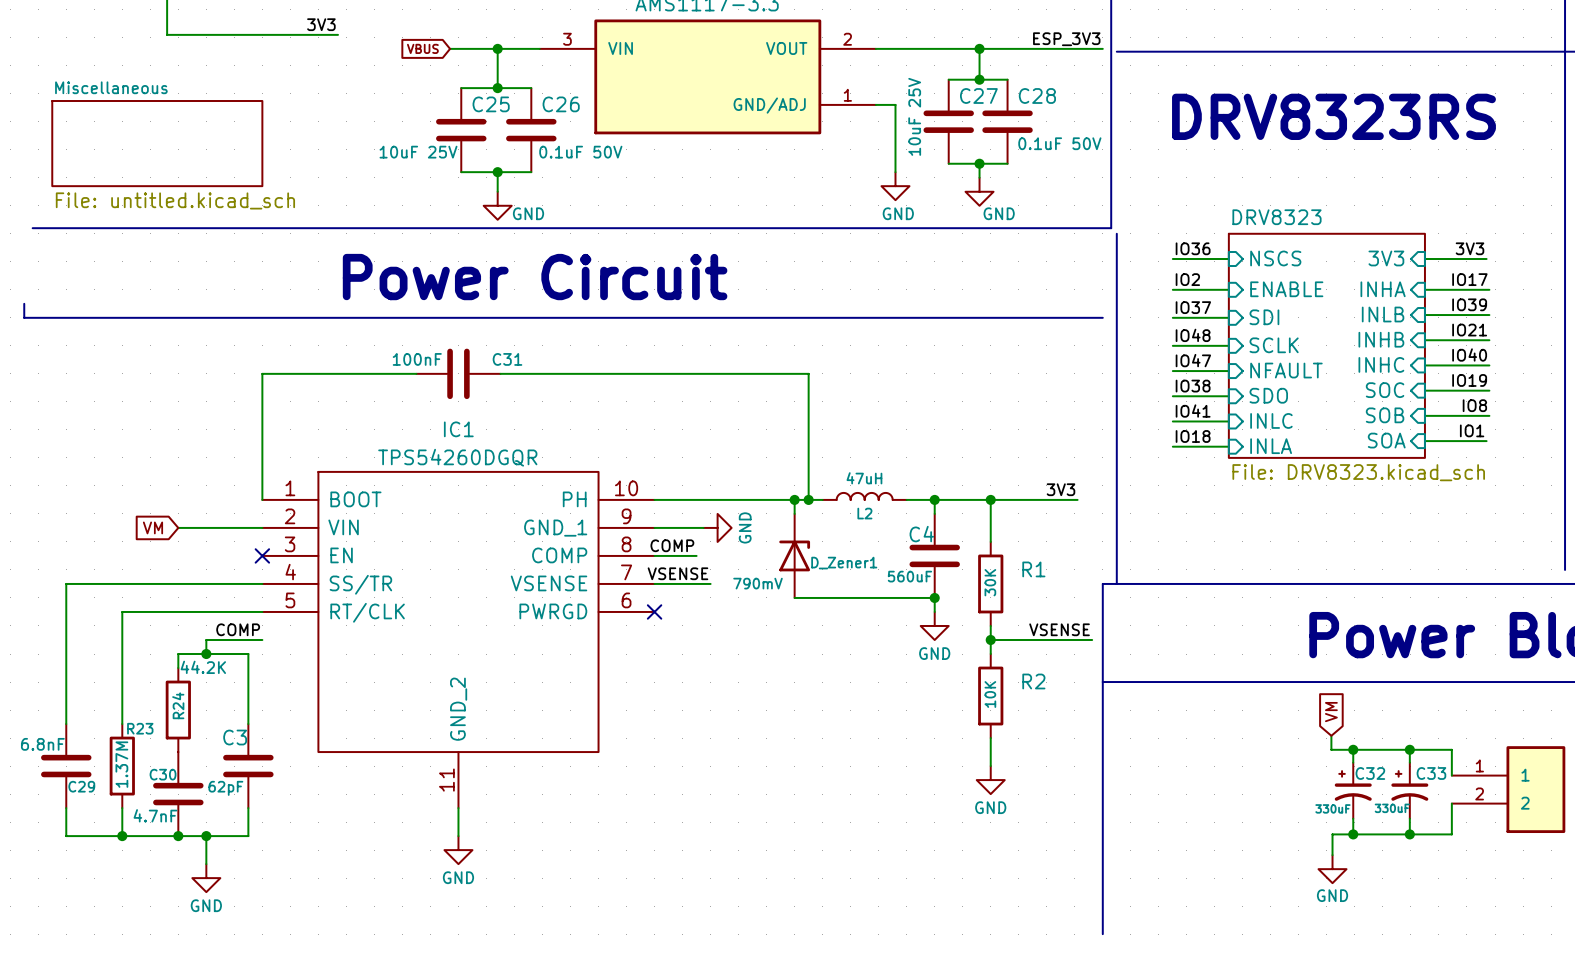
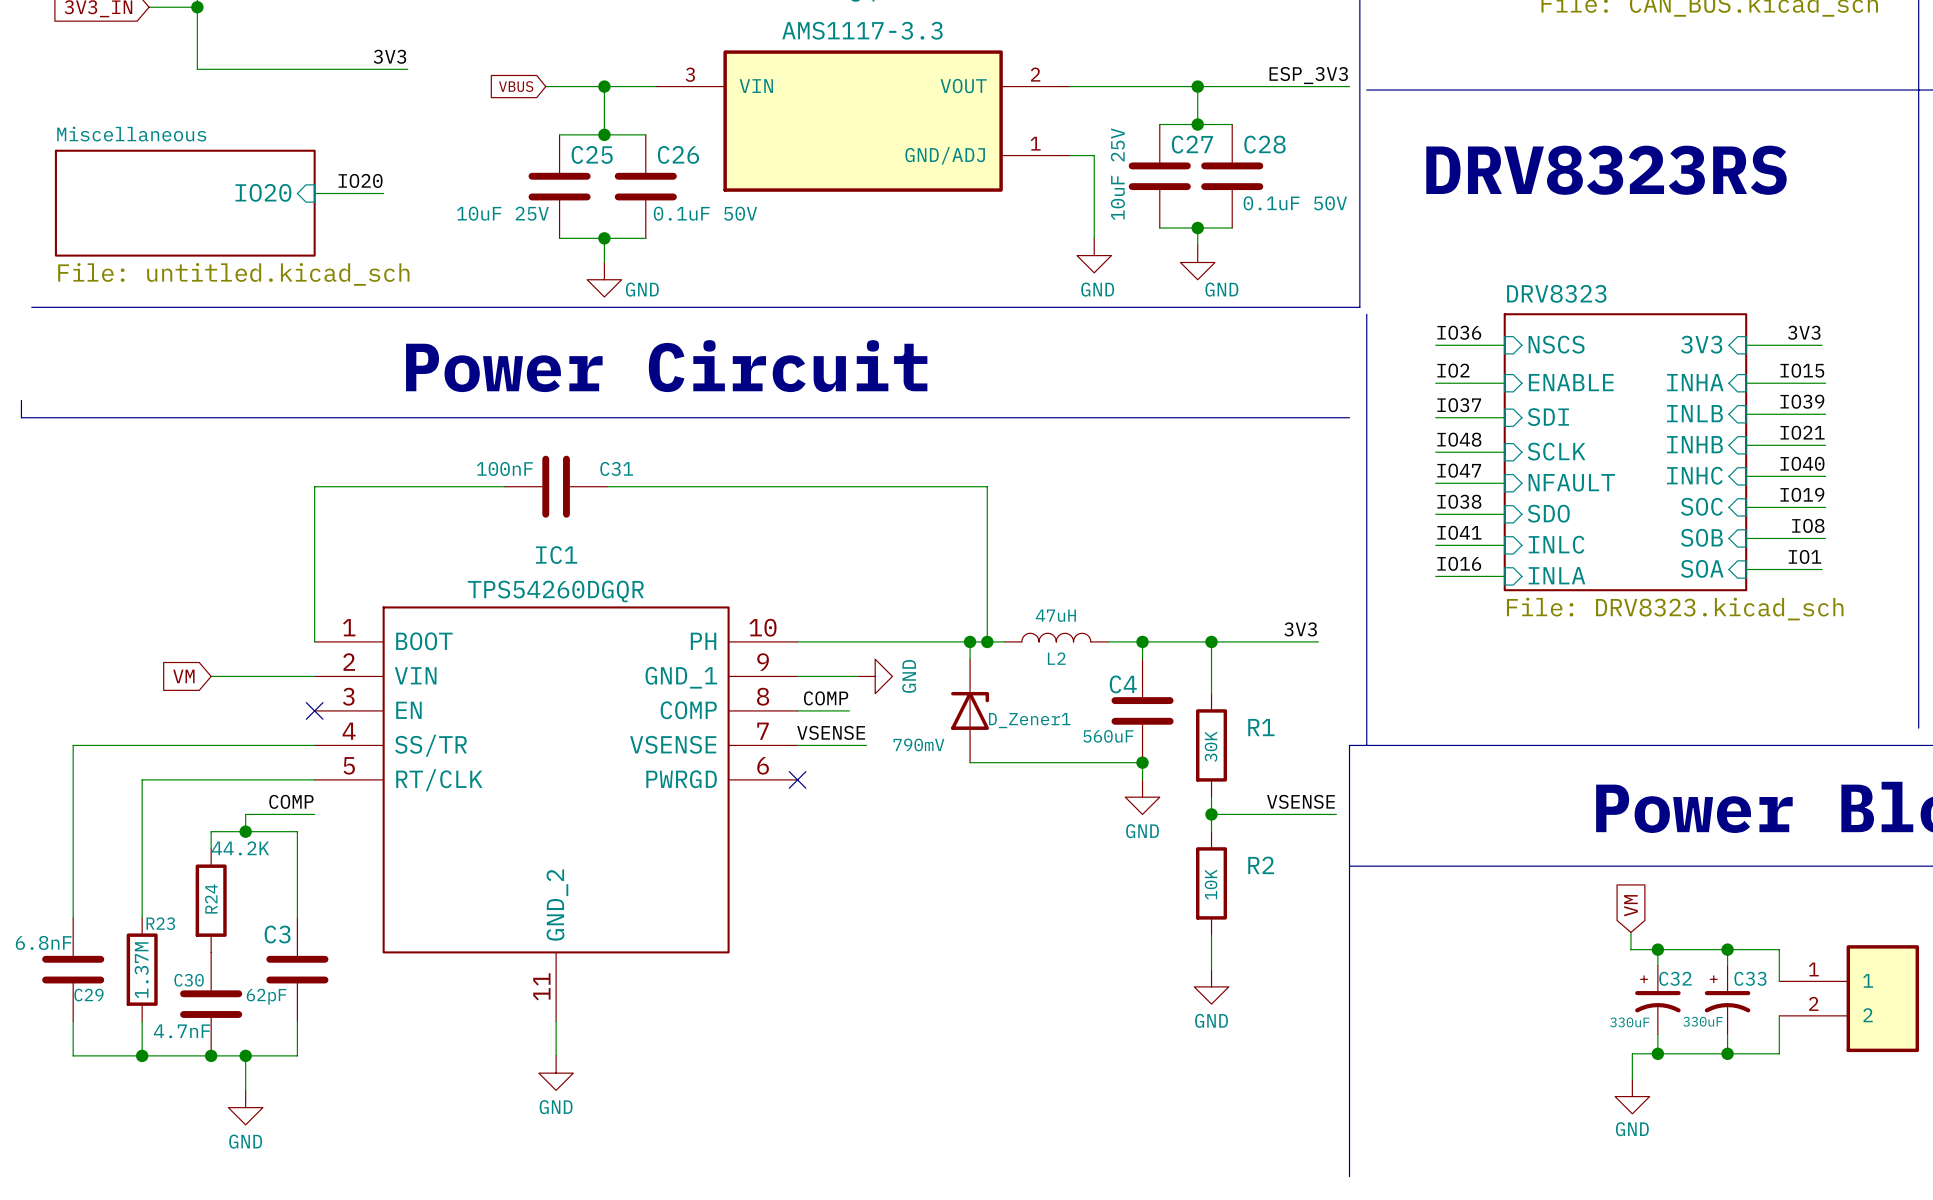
label: none -> IO20 (360, 180)
sheet pin: none -> IO20 (263, 192)
wire: none -> (314, 193) (383, 193)
label: IO17 (1469, 279) -> IO15 (1802, 370)
label: IO18 (1193, 436) -> IO16 (1459, 563)

